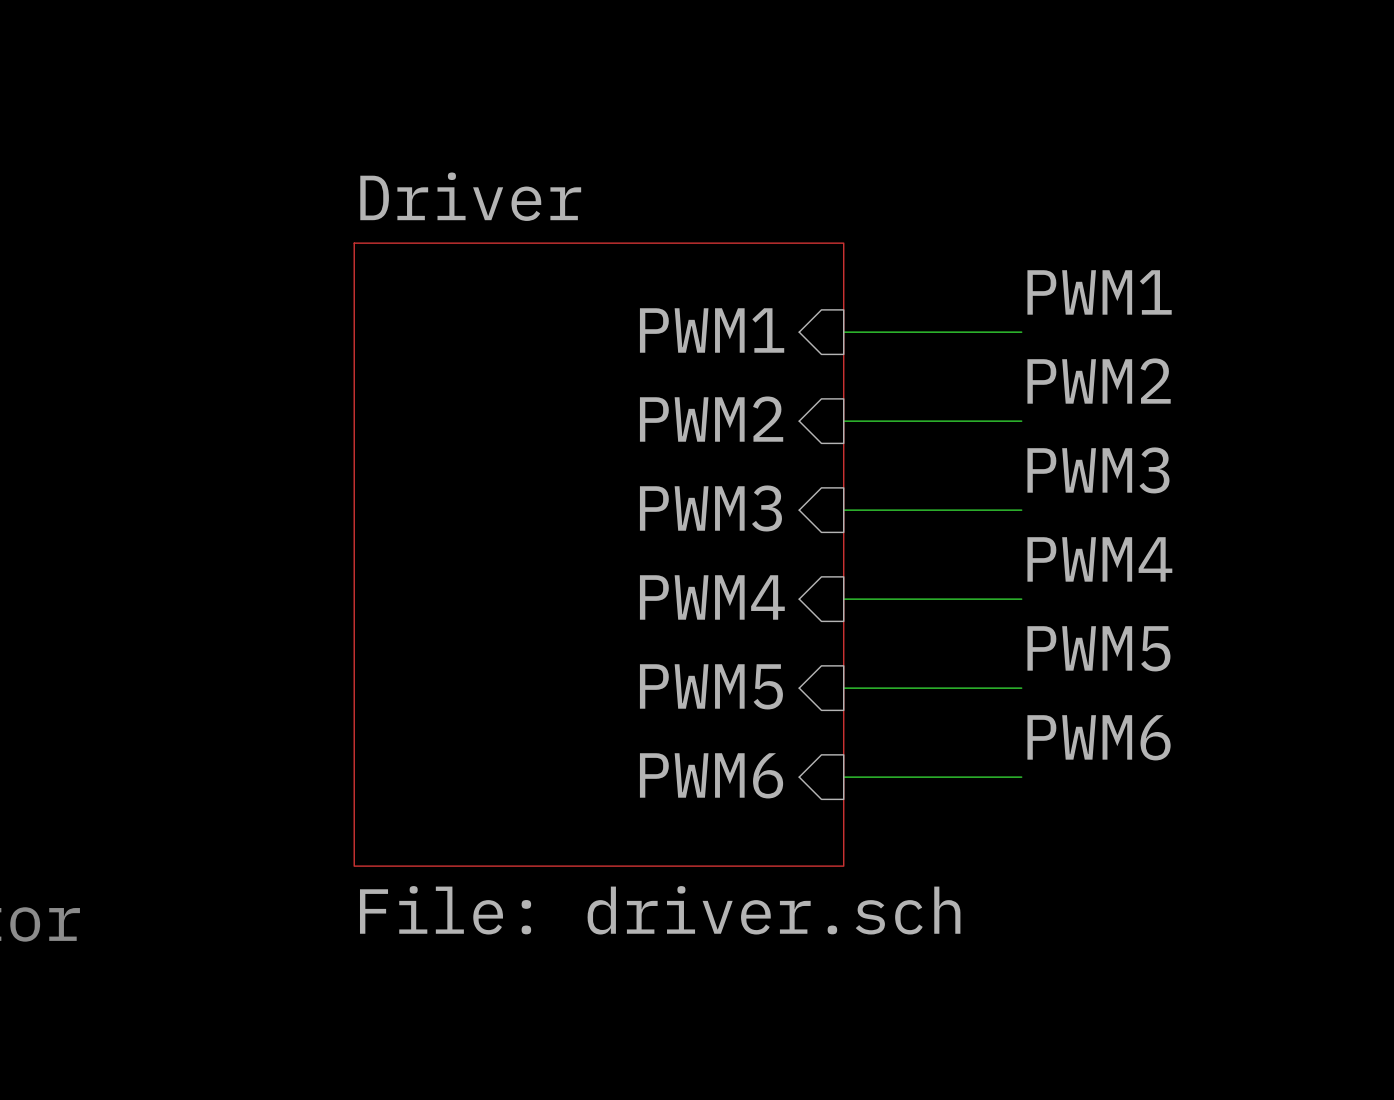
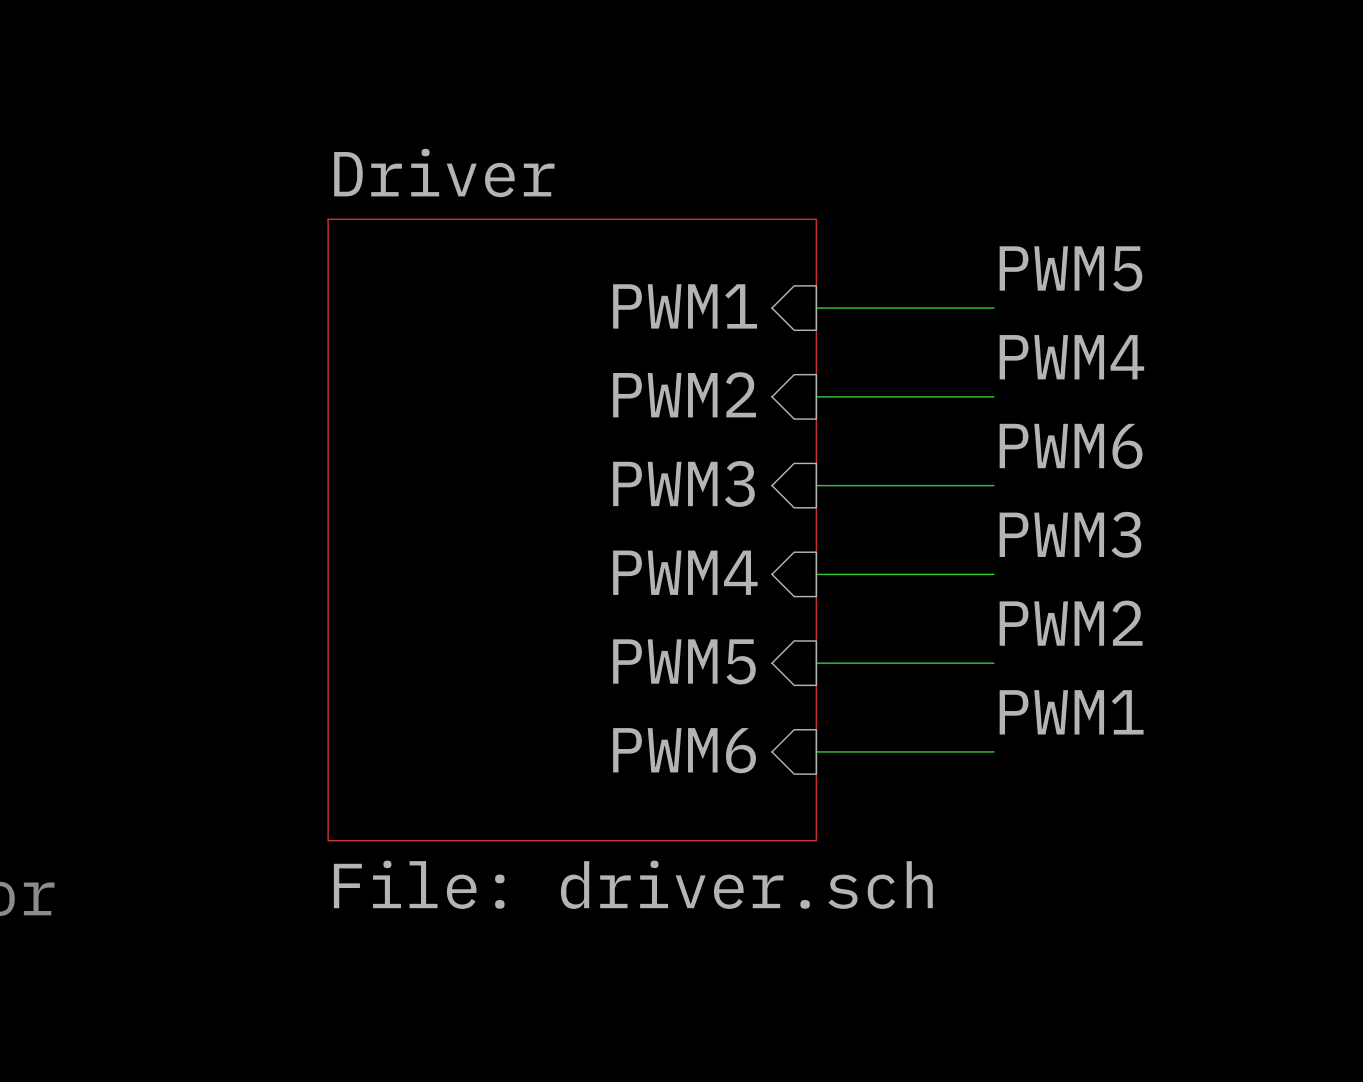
label: PWM1 (1099, 292) -> PWM5 (1070, 268)
label: PWM2 (1099, 381) -> PWM4 (1071, 357)
label: PWM3 (1098, 470) -> PWM6 (1071, 446)
label: PWM4 (1099, 559) -> PWM3 (1070, 534)
label: PWM5 (1098, 648) -> PWM2 (1071, 623)
label: PWM6 (1099, 737) -> PWM1 (1071, 712)

